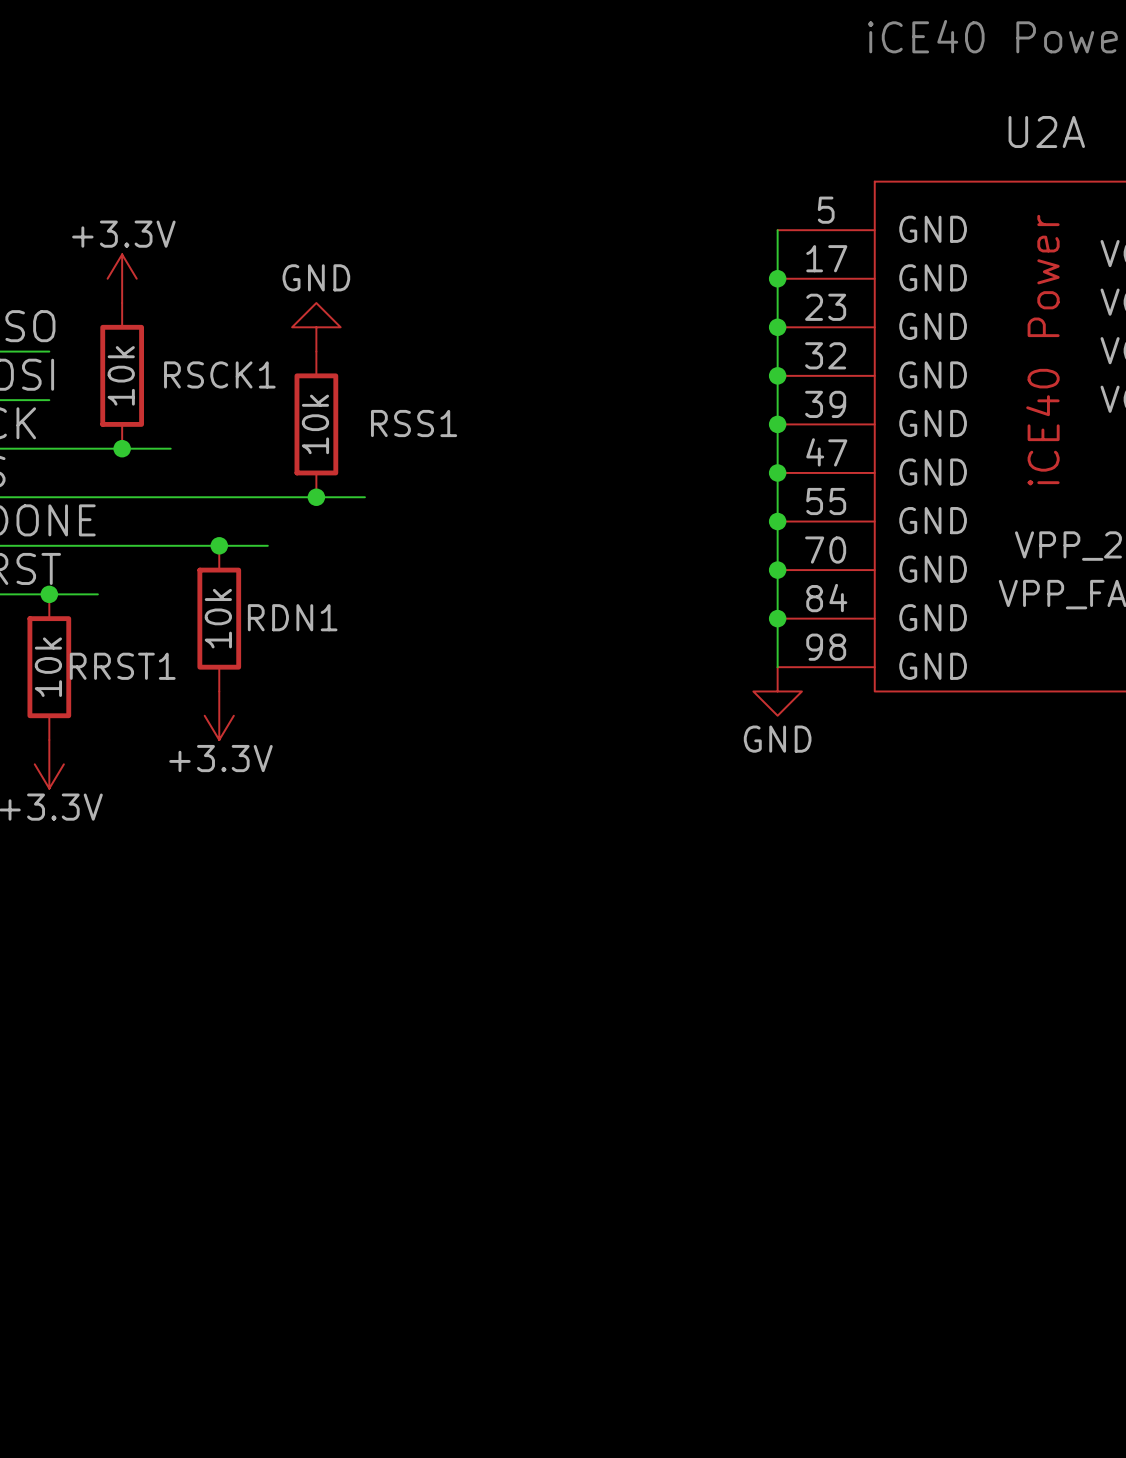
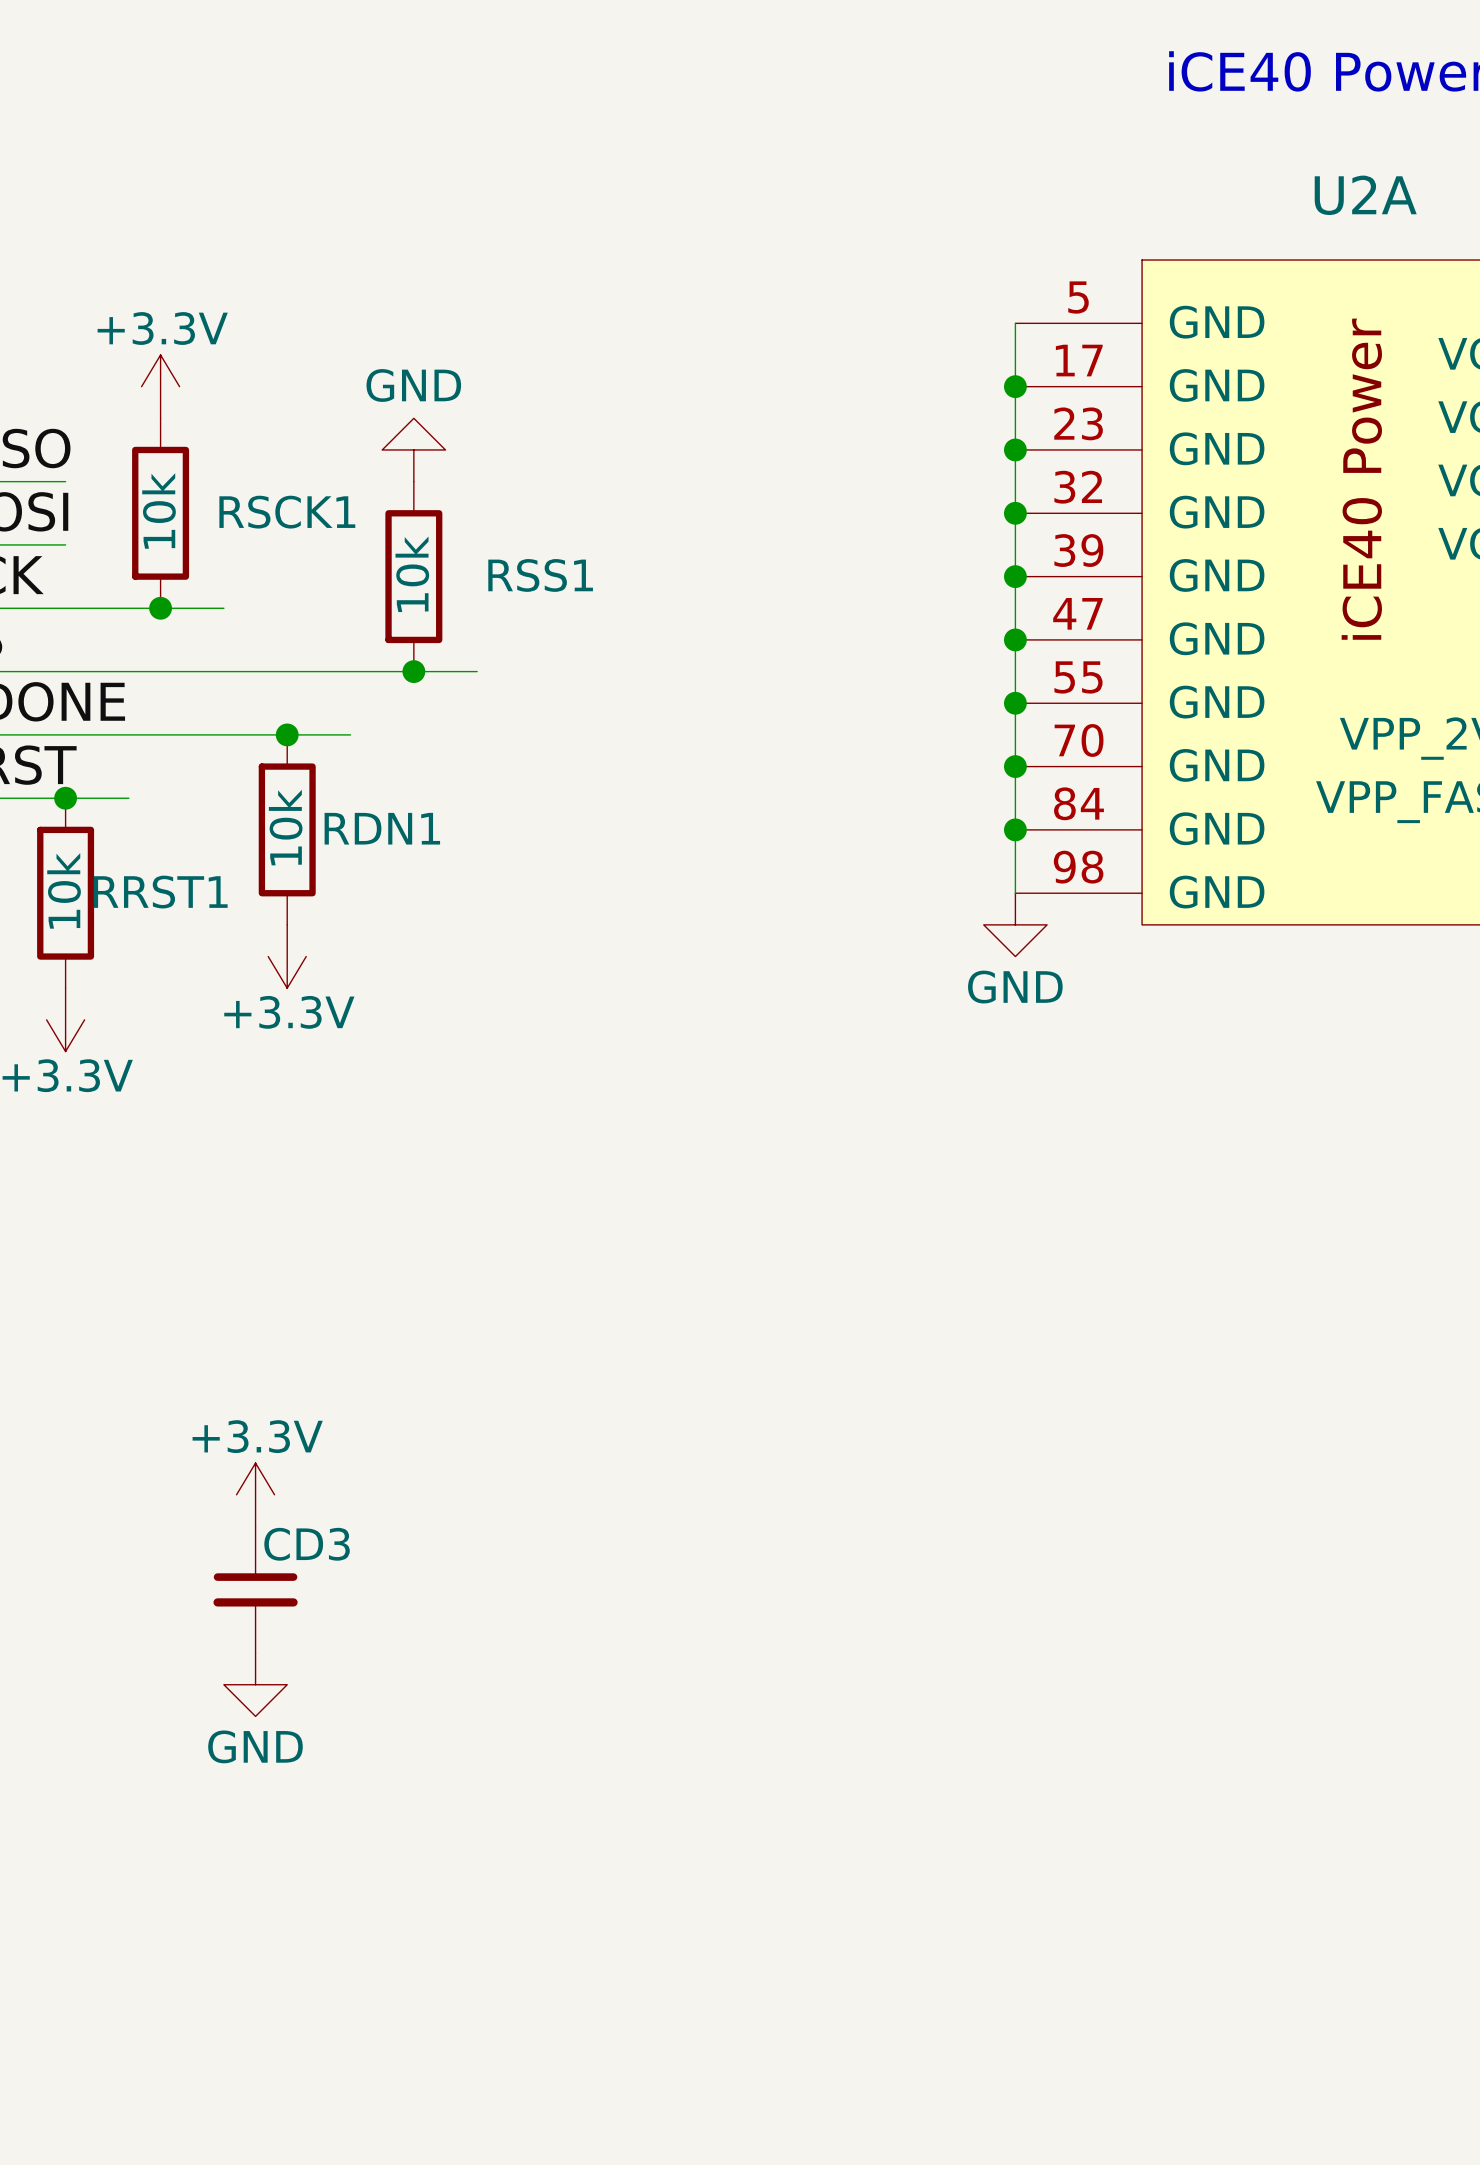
power symbol: none -> +3.3V (255, 1494)
CD3: none -> (255, 1589)
power symbol: none -> GND (255, 1684)

